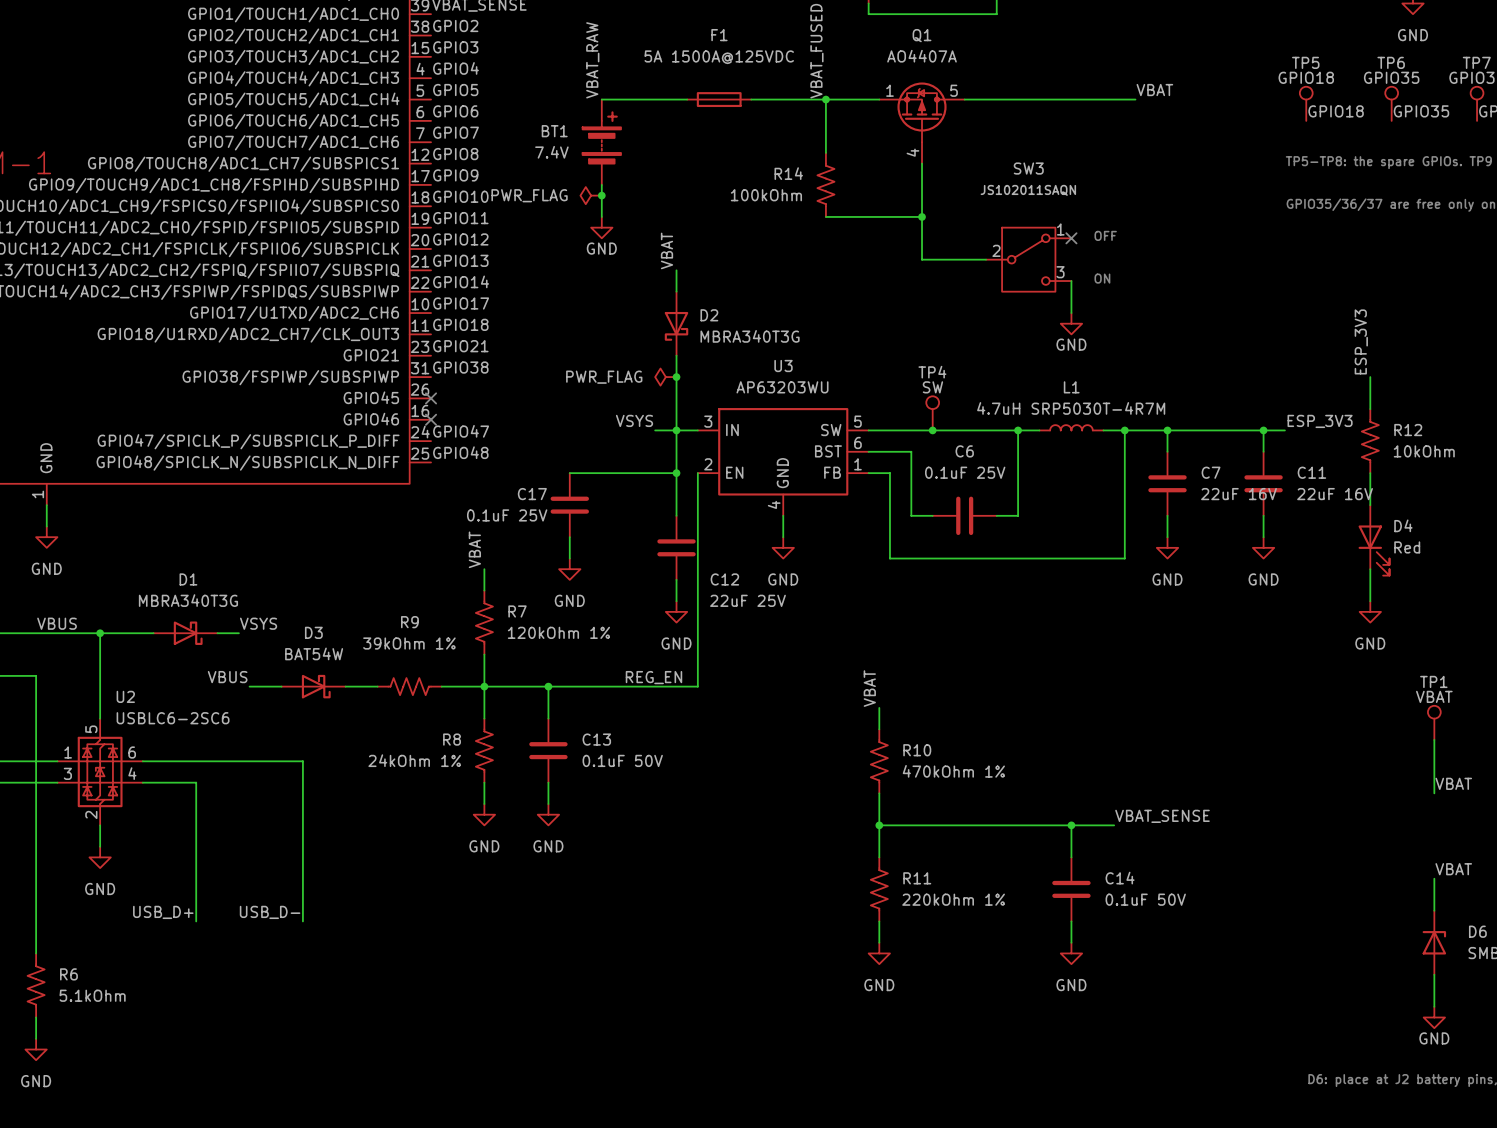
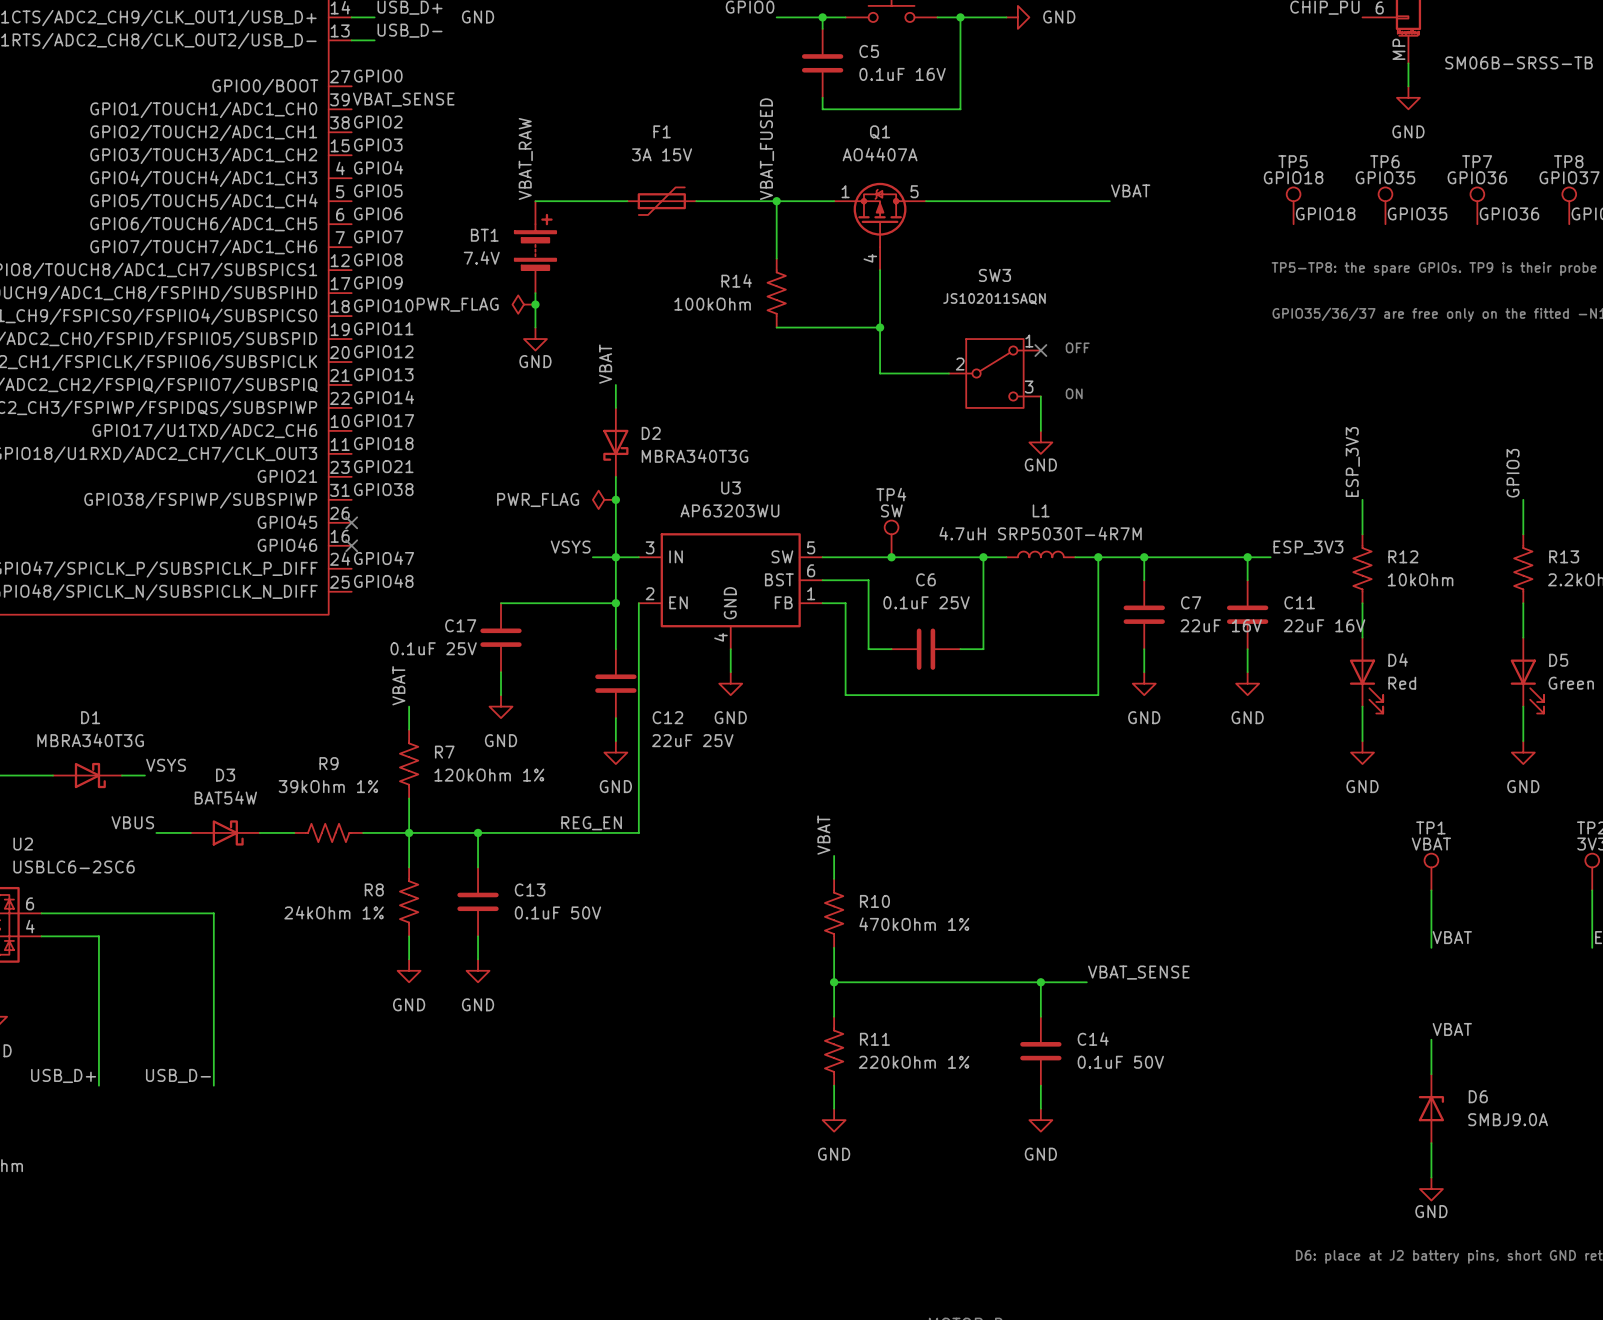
F1 value: 5A 1500A@125VDC (719, 57) -> 3A 15V (662, 154)
F1 symbol: [687, 92, 752, 108] -> [627, 187, 697, 215]

